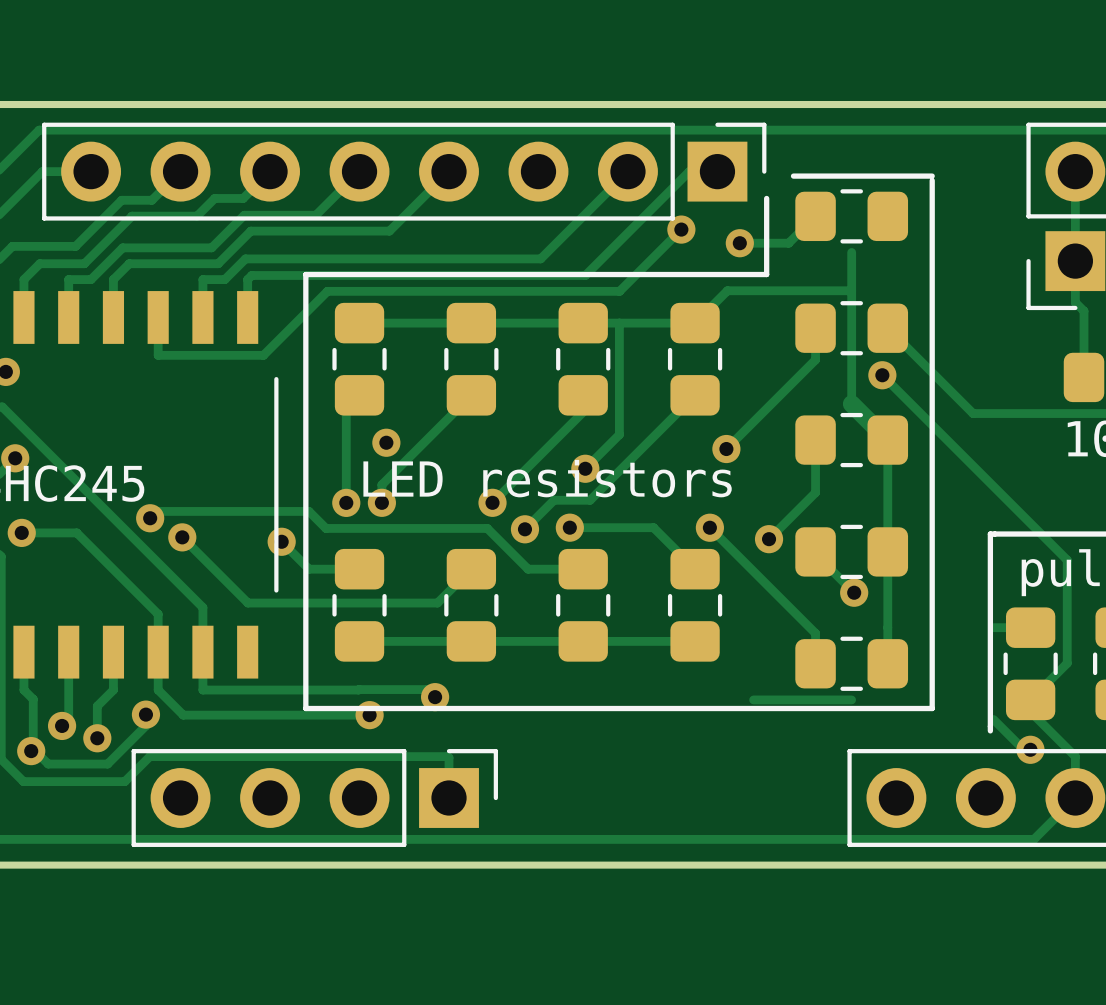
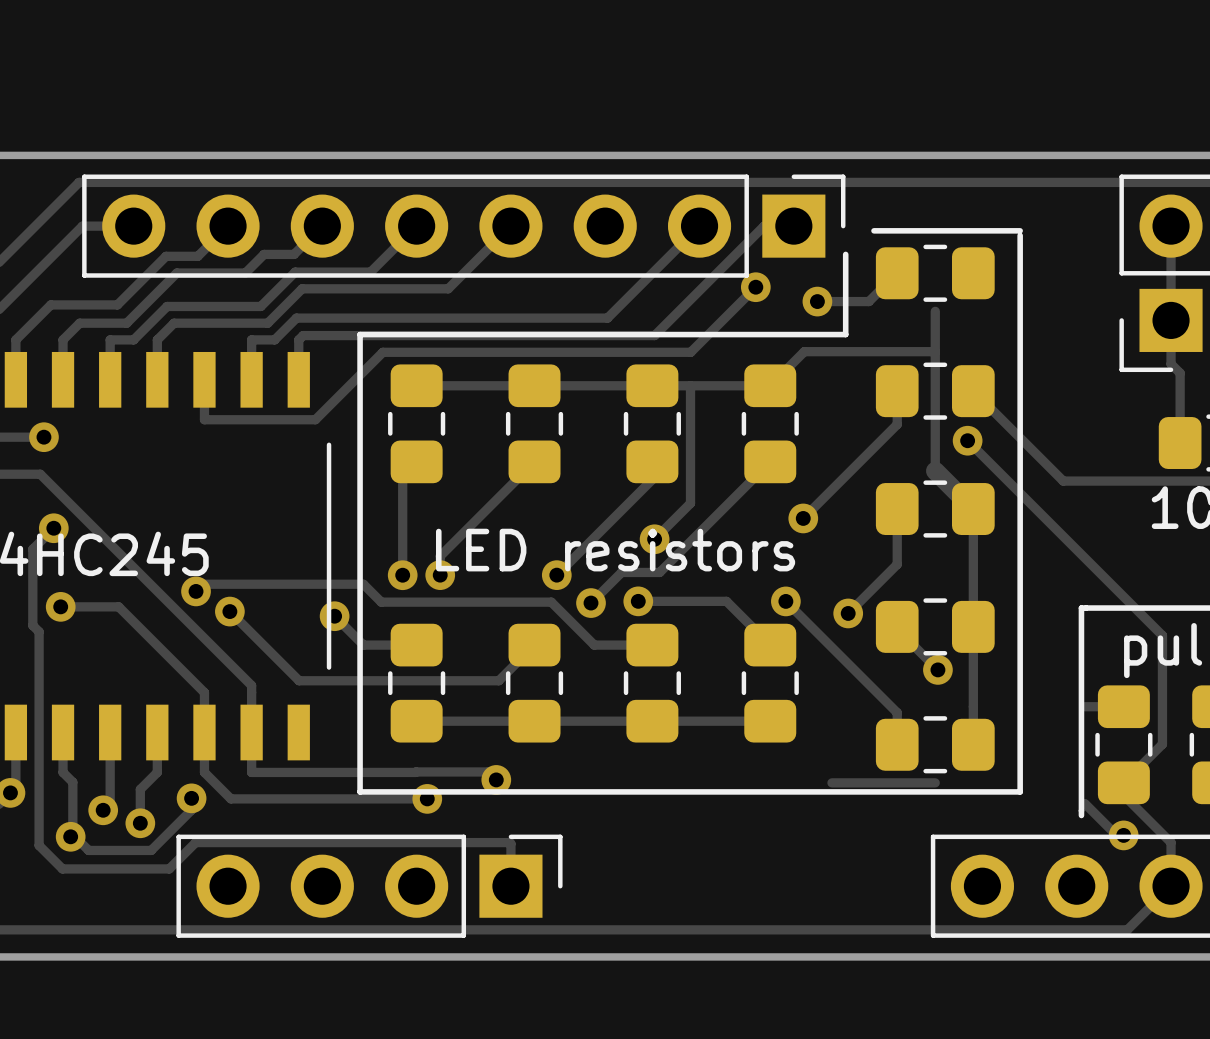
via: (386, 442) -> none

